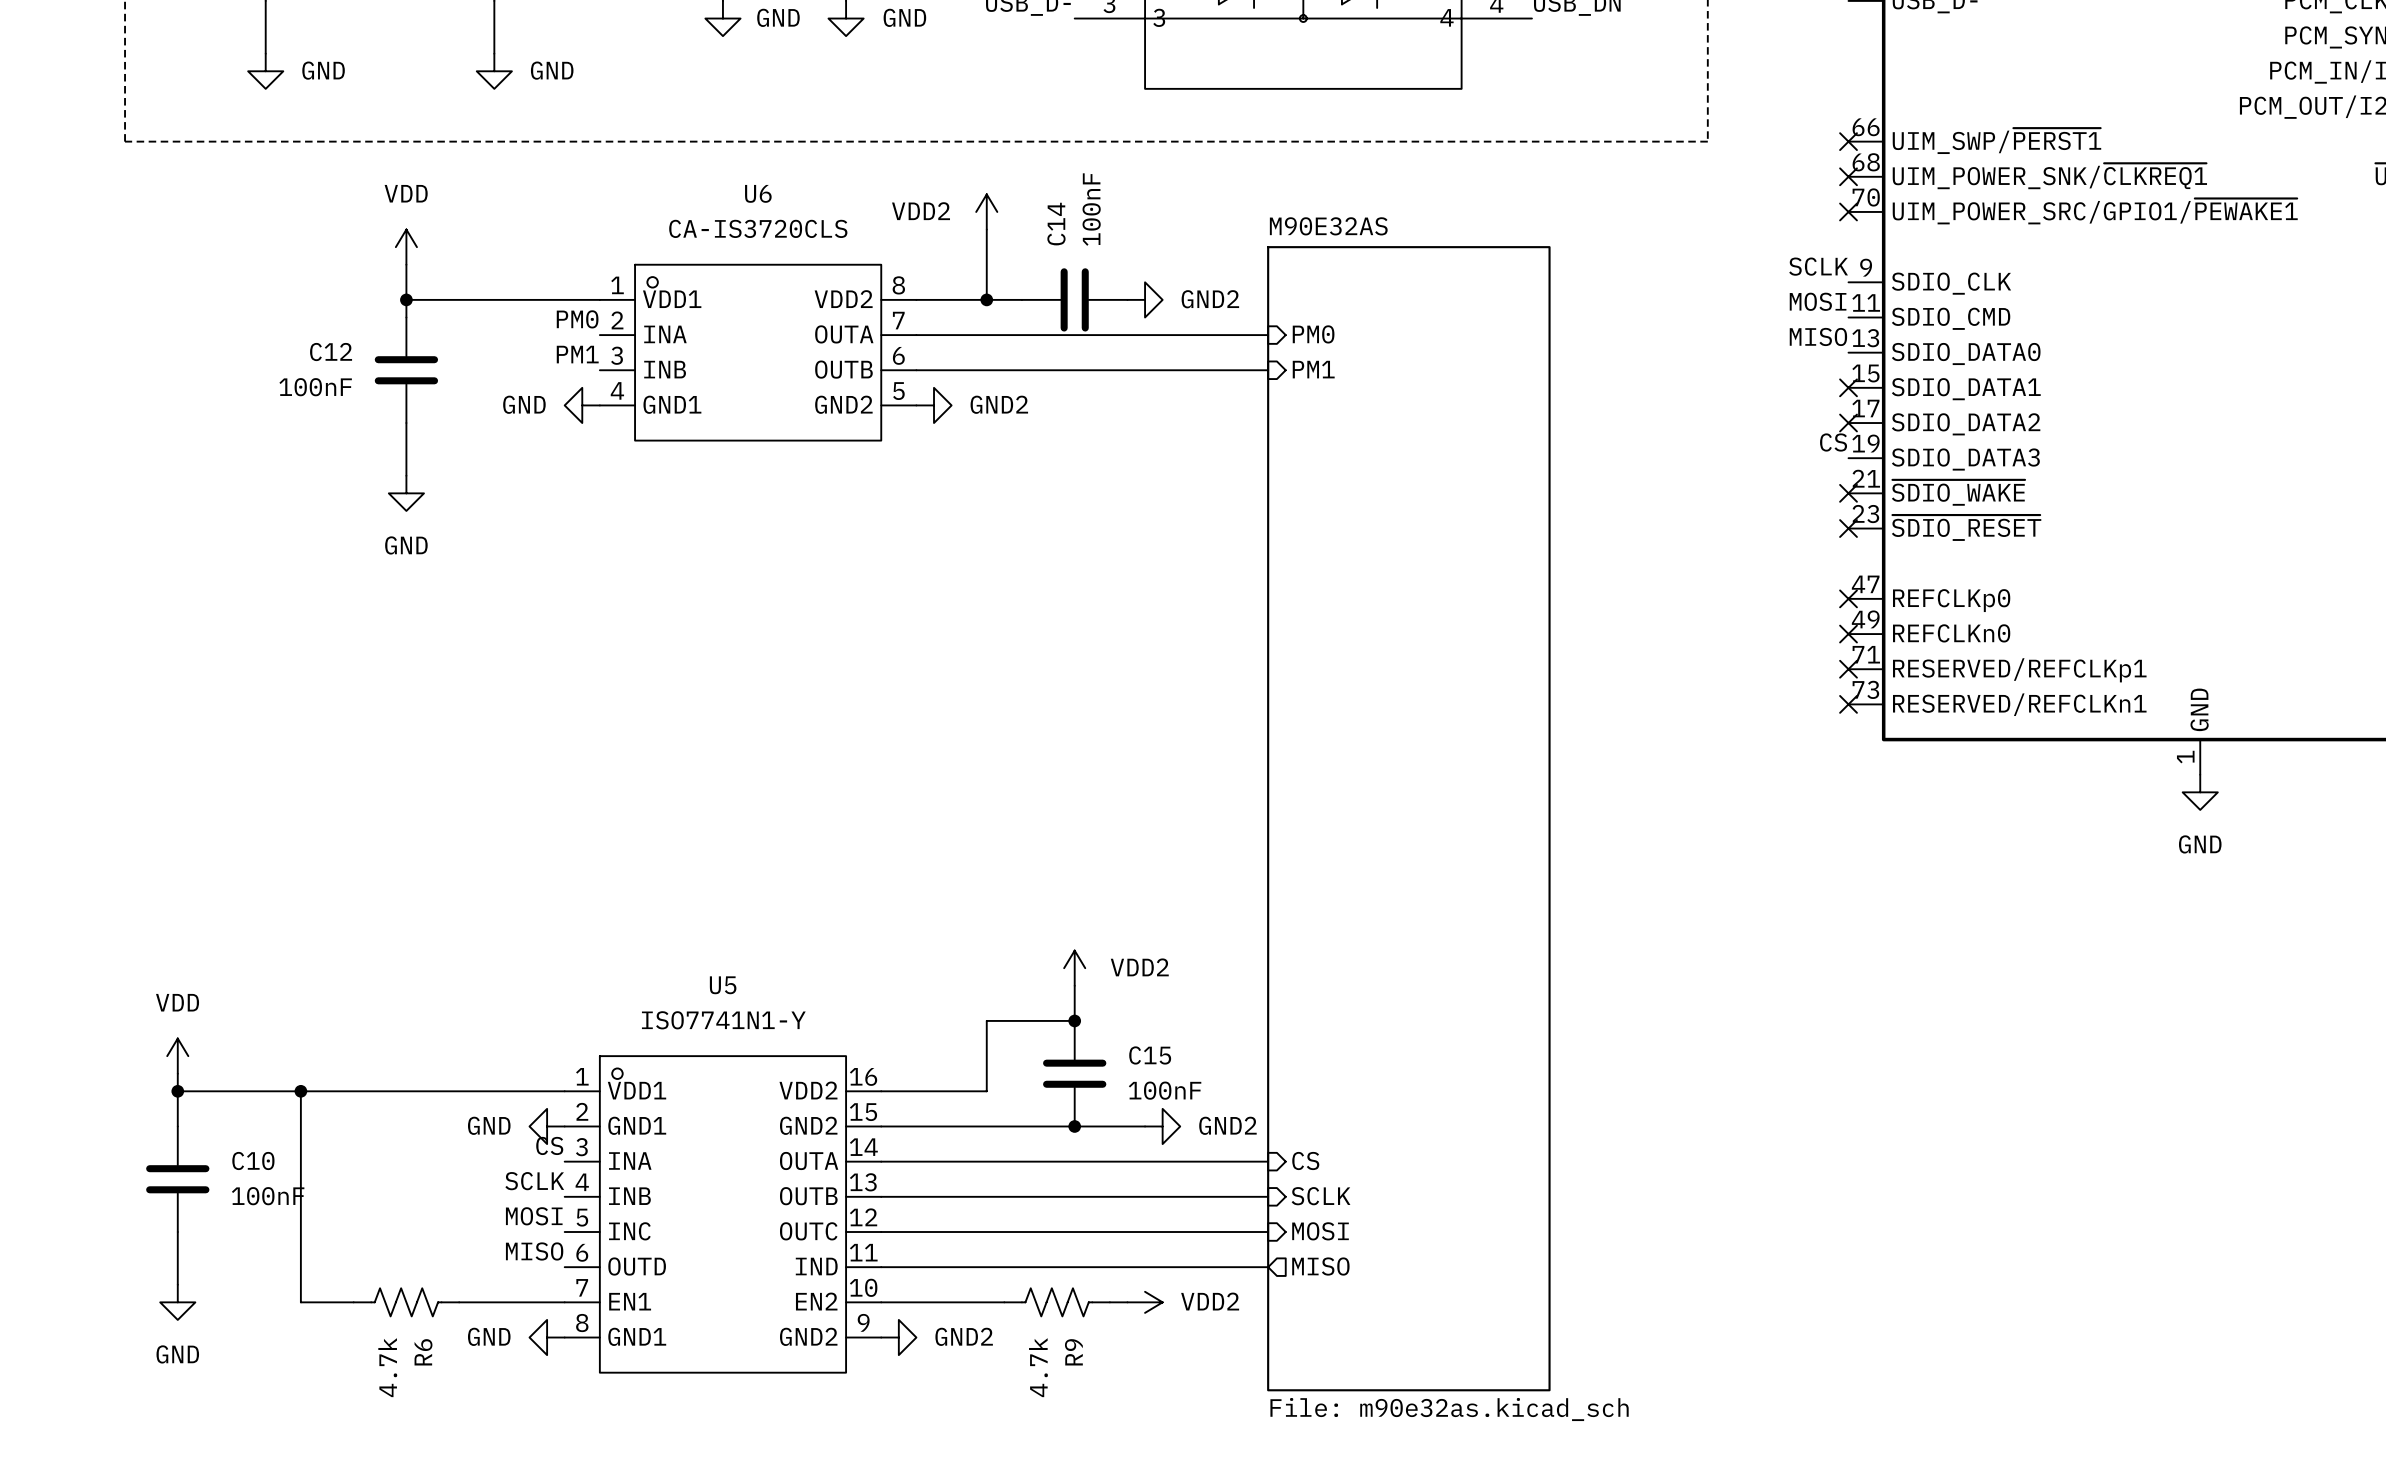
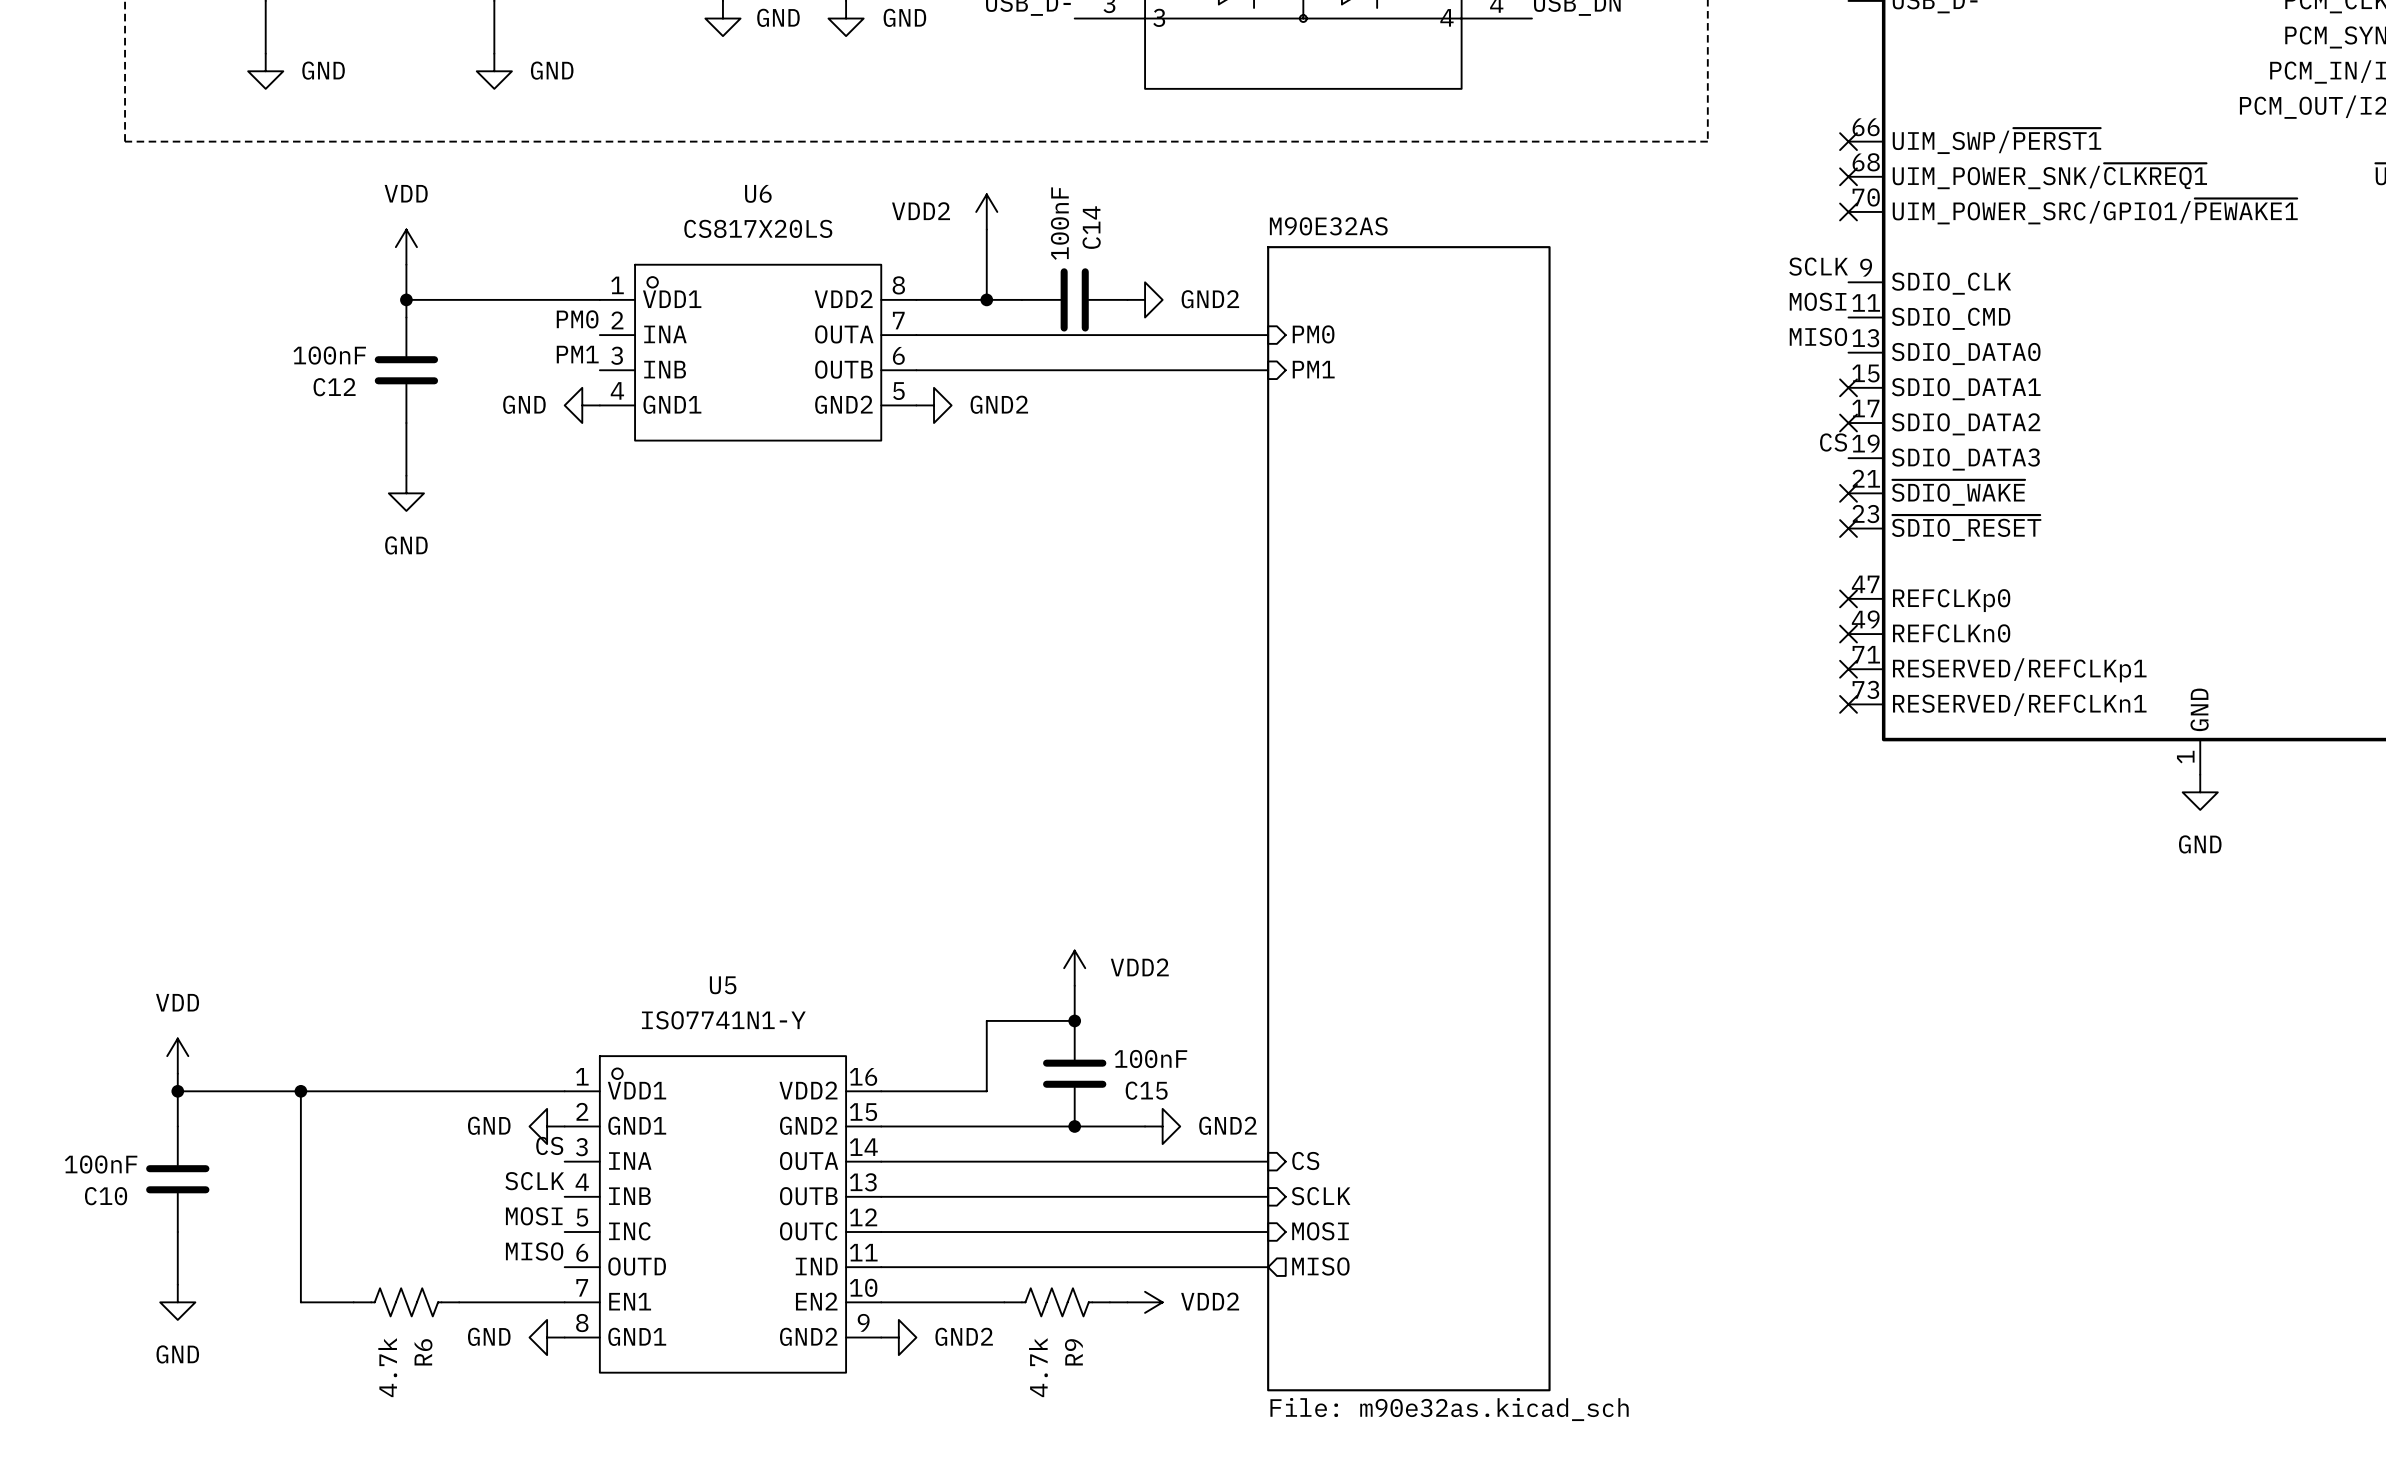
C14 value position: 100nF (1091, 209) -> 100nF (1059, 223)
C14 name position: C14 (1056, 224) -> C14 (1091, 227)
U6 value: CA-IS3720CLS (758, 228) -> CS817X20LS (758, 228)
C12 name position: C12 (331, 352) -> C12 (334, 387)
C12 value position: 100nF (315, 387) -> 100nF (329, 355)
C15 name position: C15 (1150, 1055) -> C15 (1146, 1090)
C15 value position: 100nF (1165, 1090) -> 100nF (1150, 1058)
C10 name position: C10 (253, 1160) -> C10 (106, 1196)
C10 value position: 100nF (268, 1196) -> 100nF (101, 1164)

